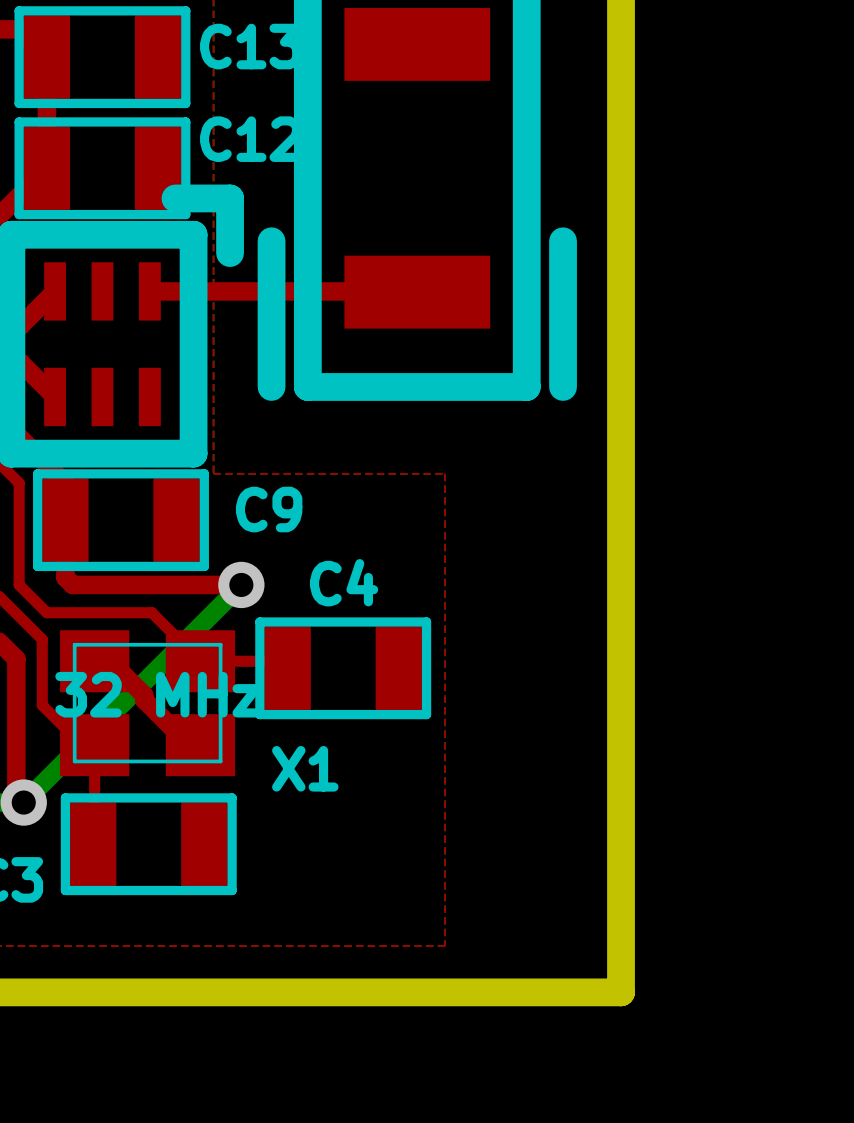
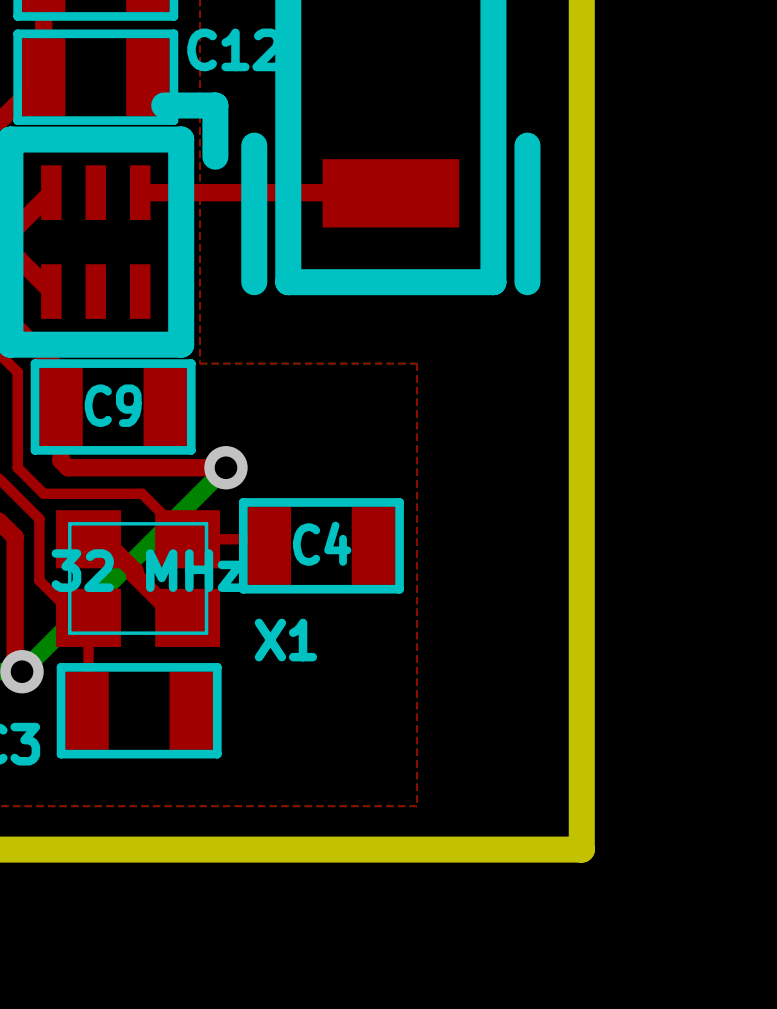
C9 name position: C9 (269, 509) -> C9 (113, 405)
C4 name position: C4 (344, 582) -> C4 (322, 543)

